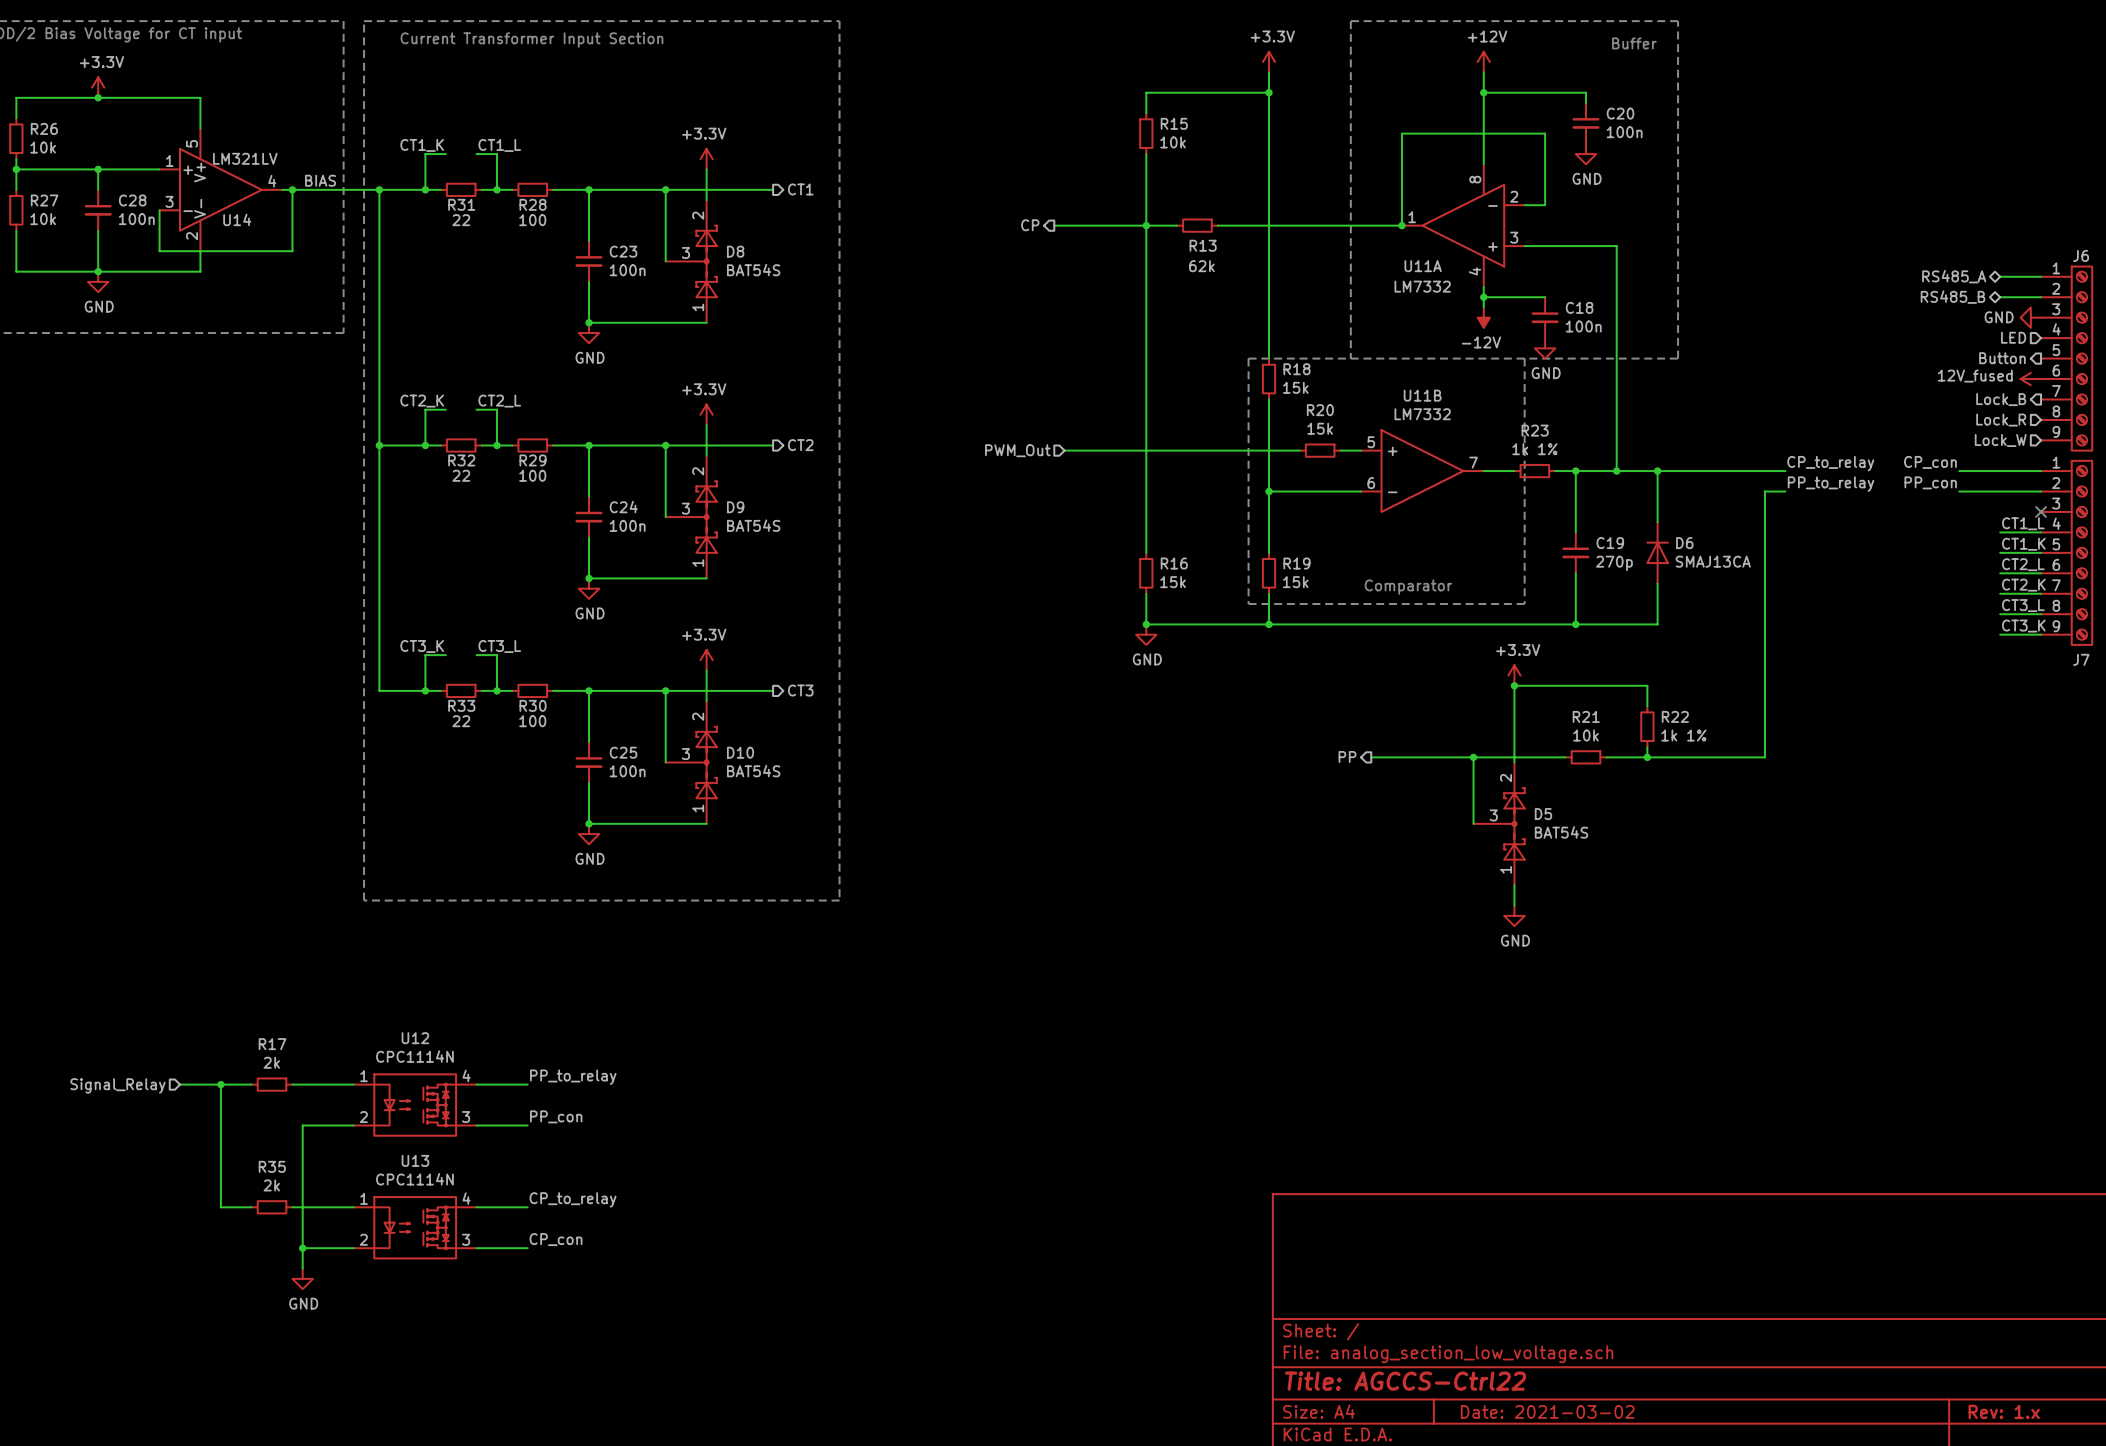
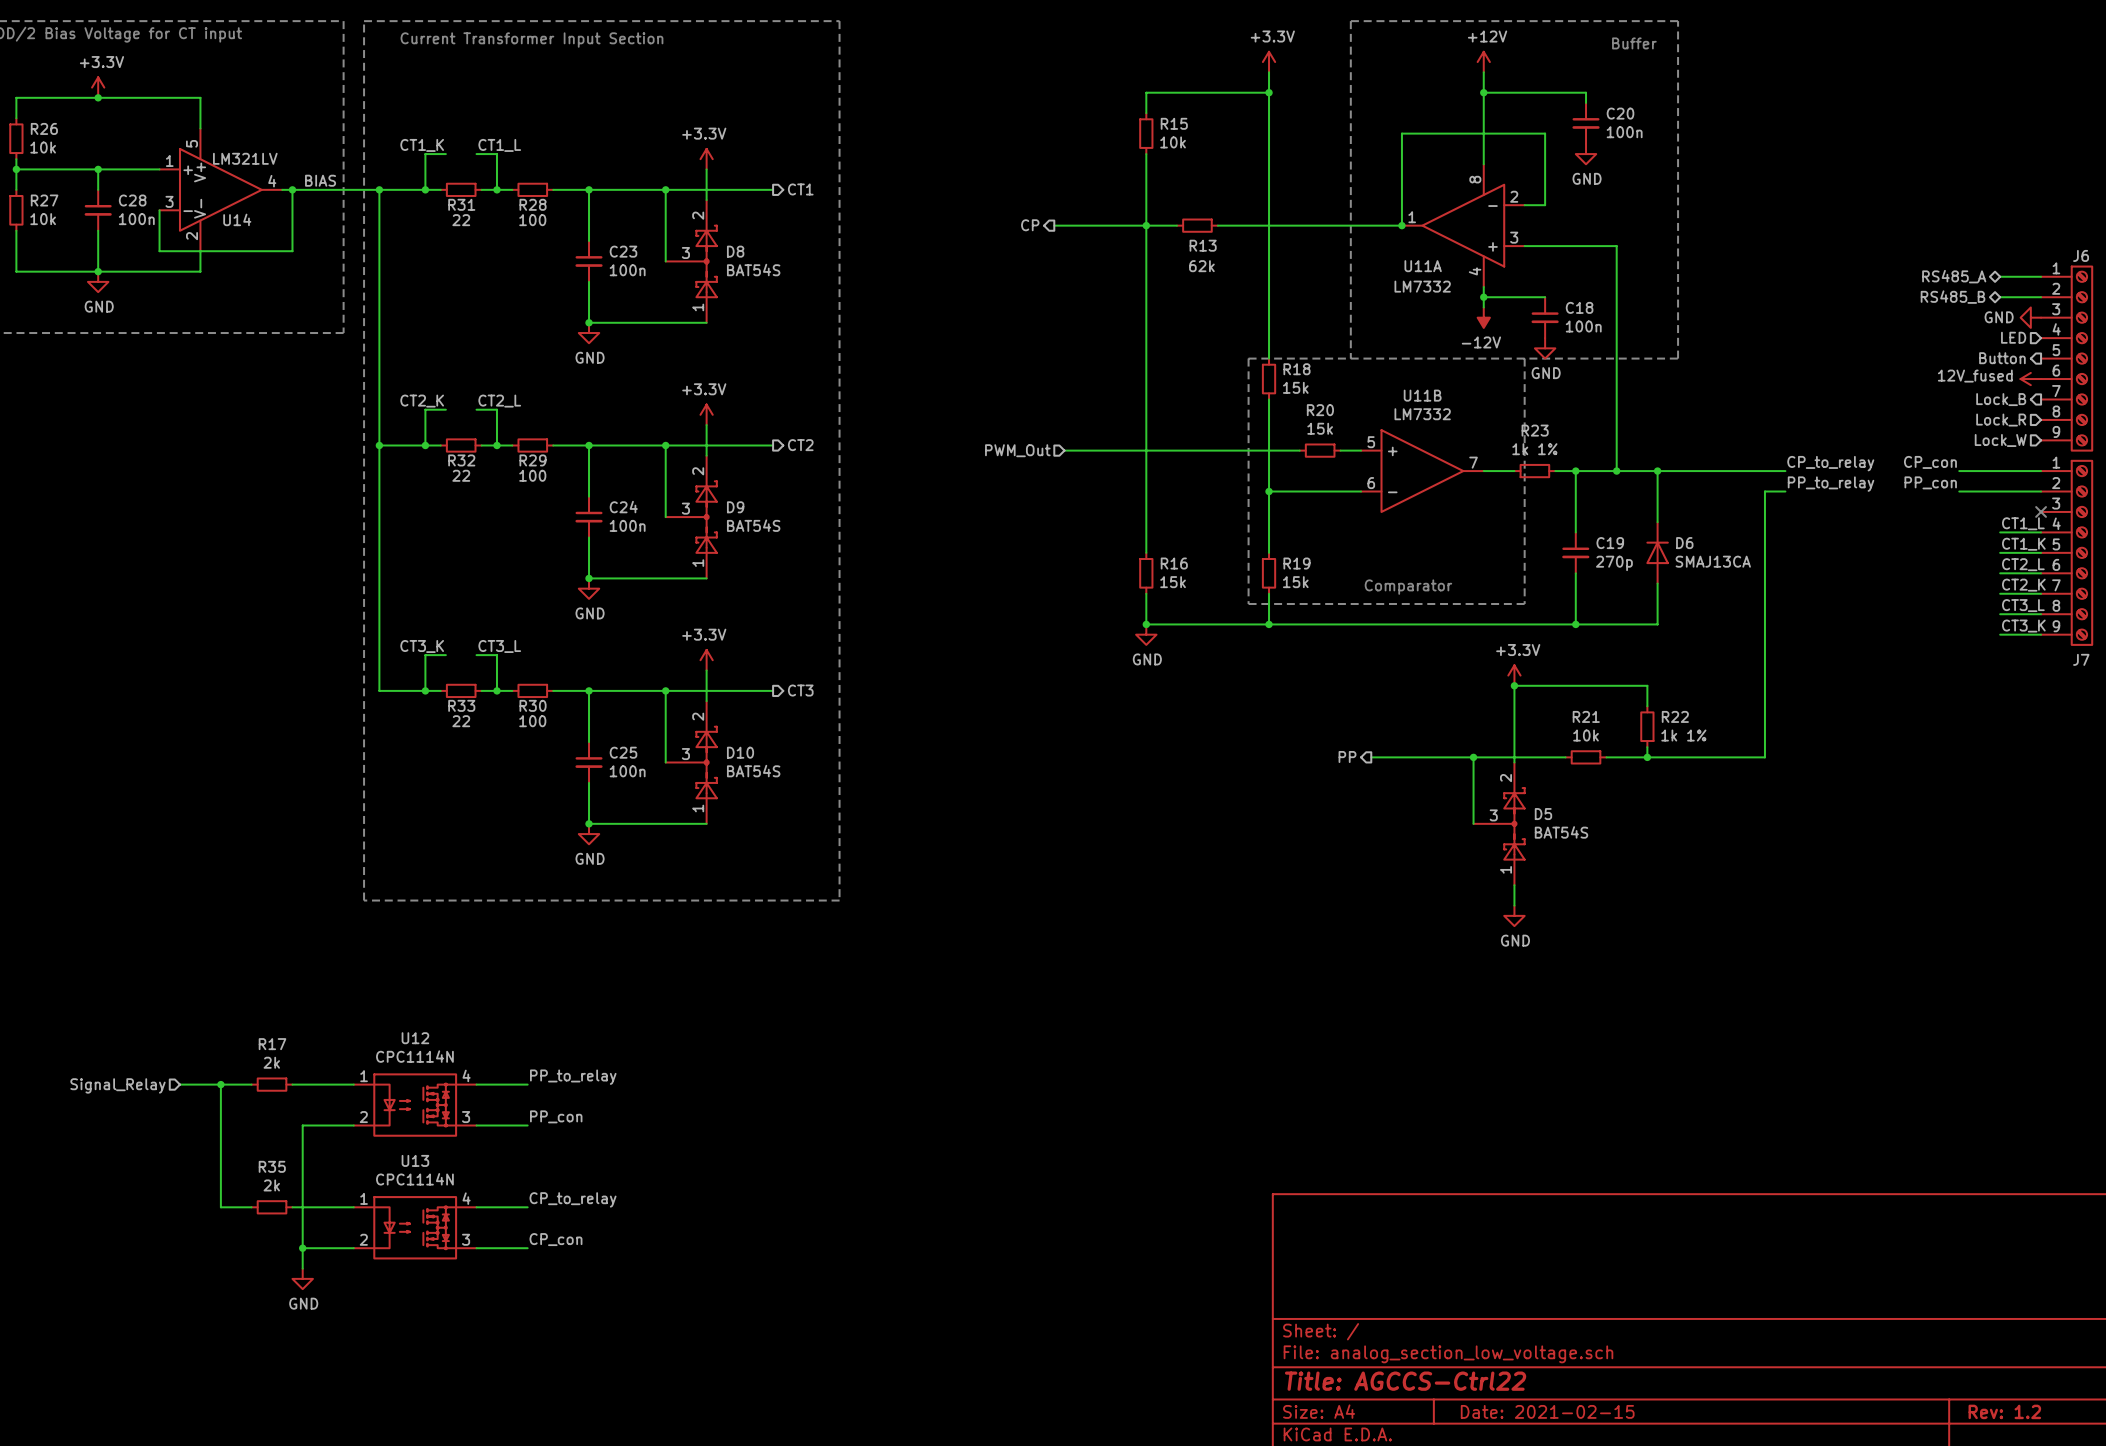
title block: Date: 2021-03-02 (1547, 1411) -> Date: 2021-02-15 (1547, 1411)
title block: Rev: 1.x (2004, 1411) -> Rev: 1.2 (2004, 1411)

